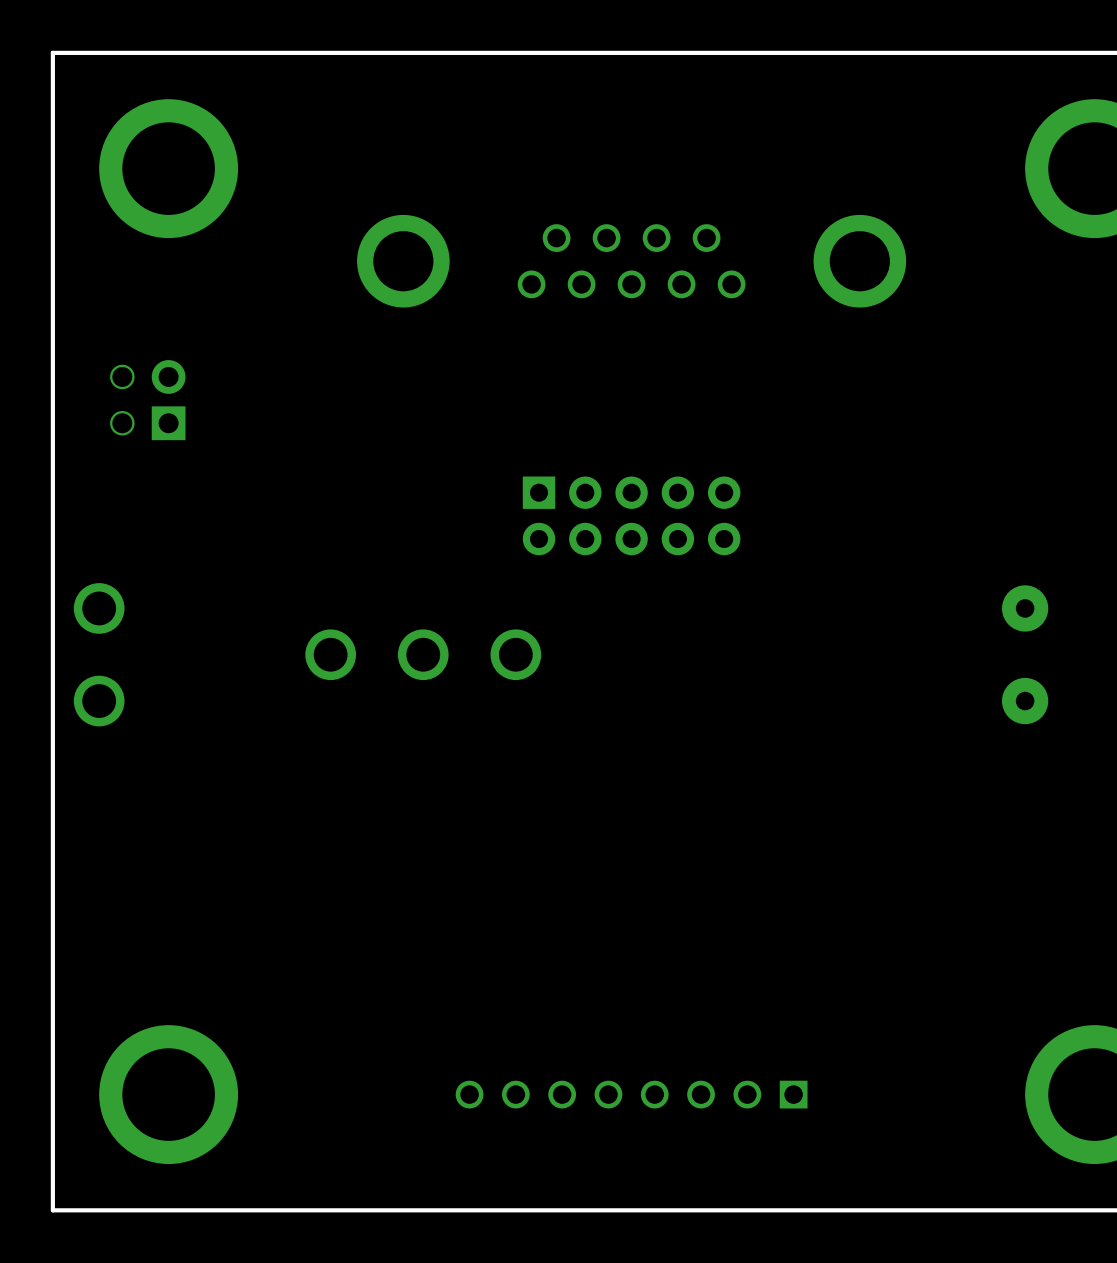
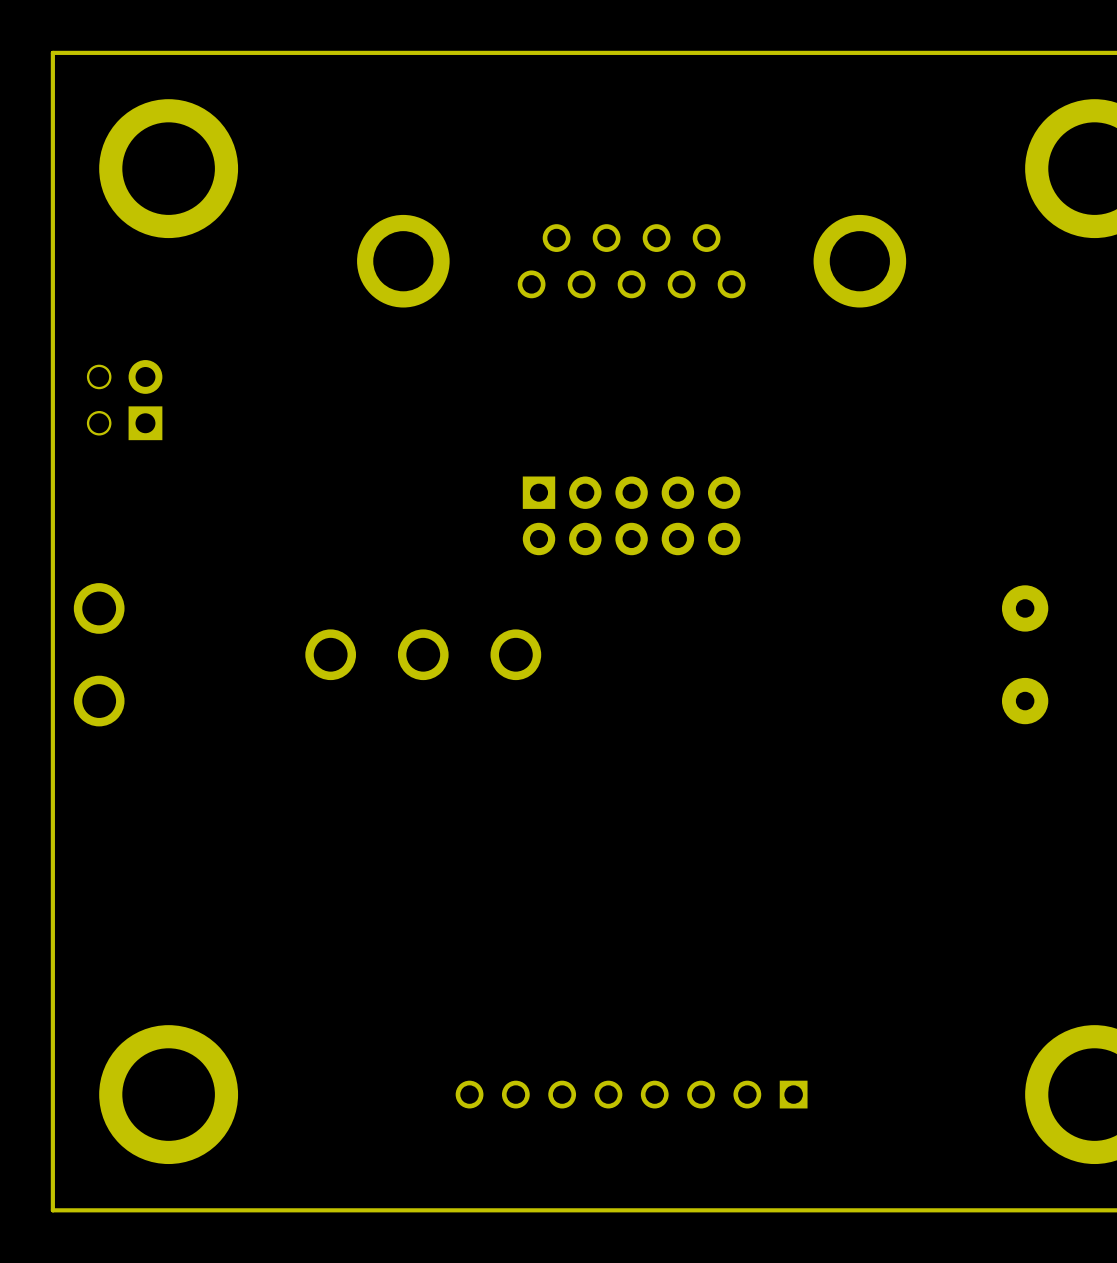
part position: (147, 400) -> (124, 400)

